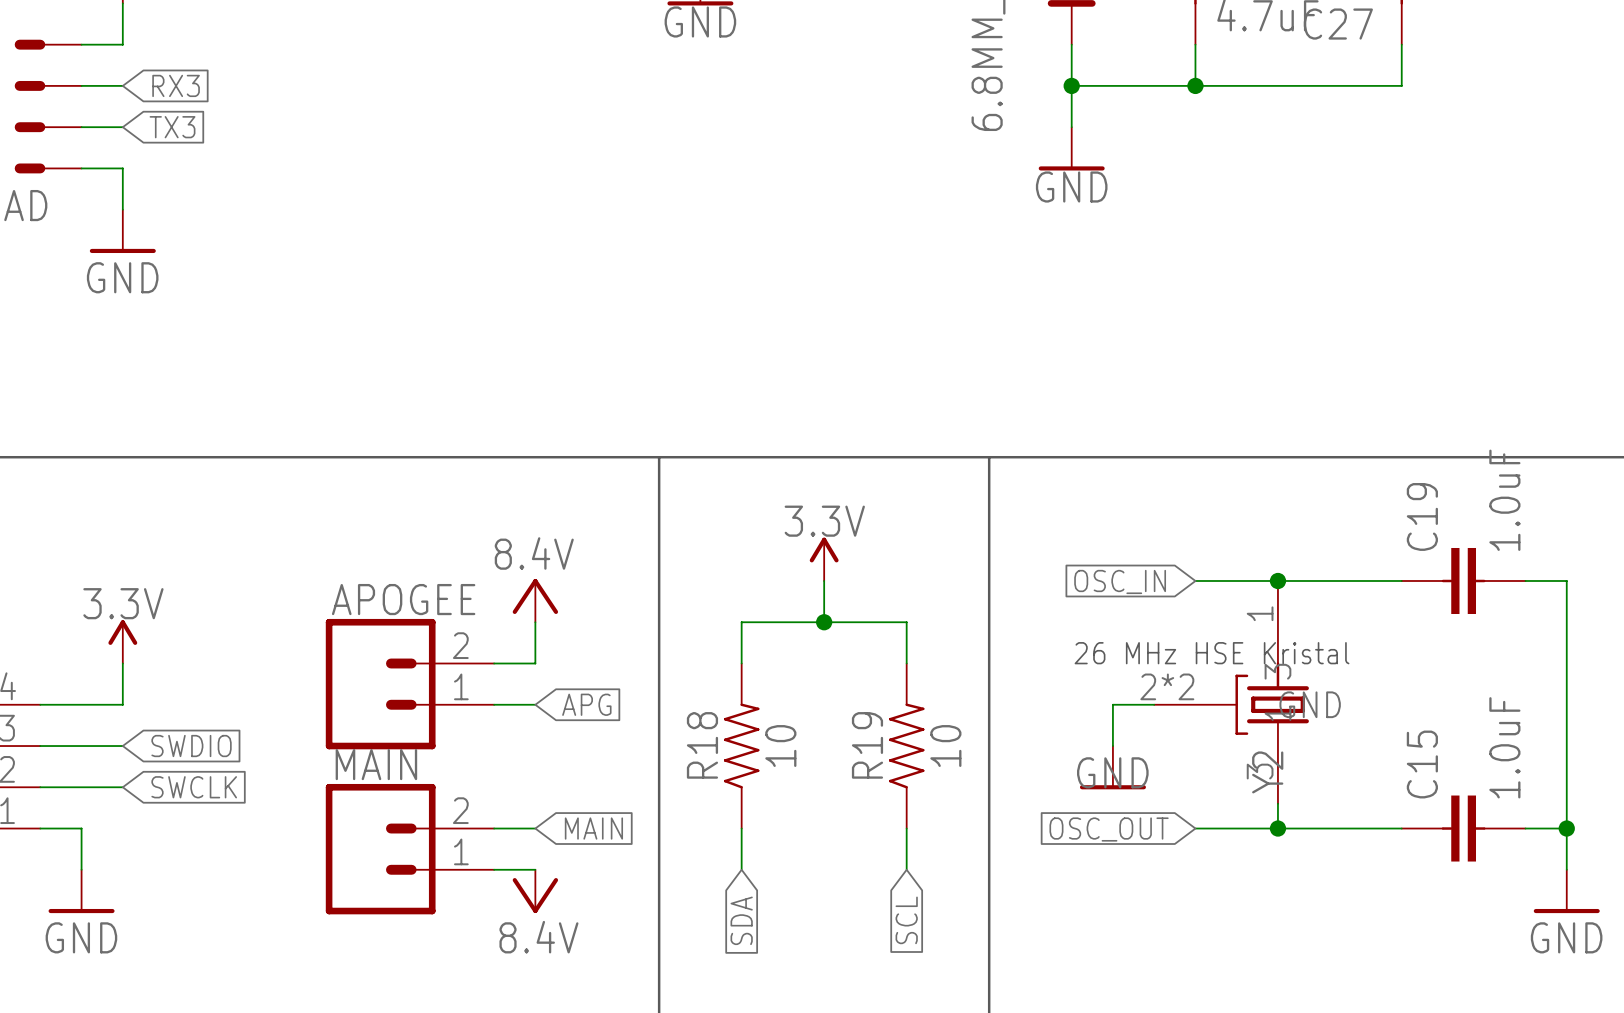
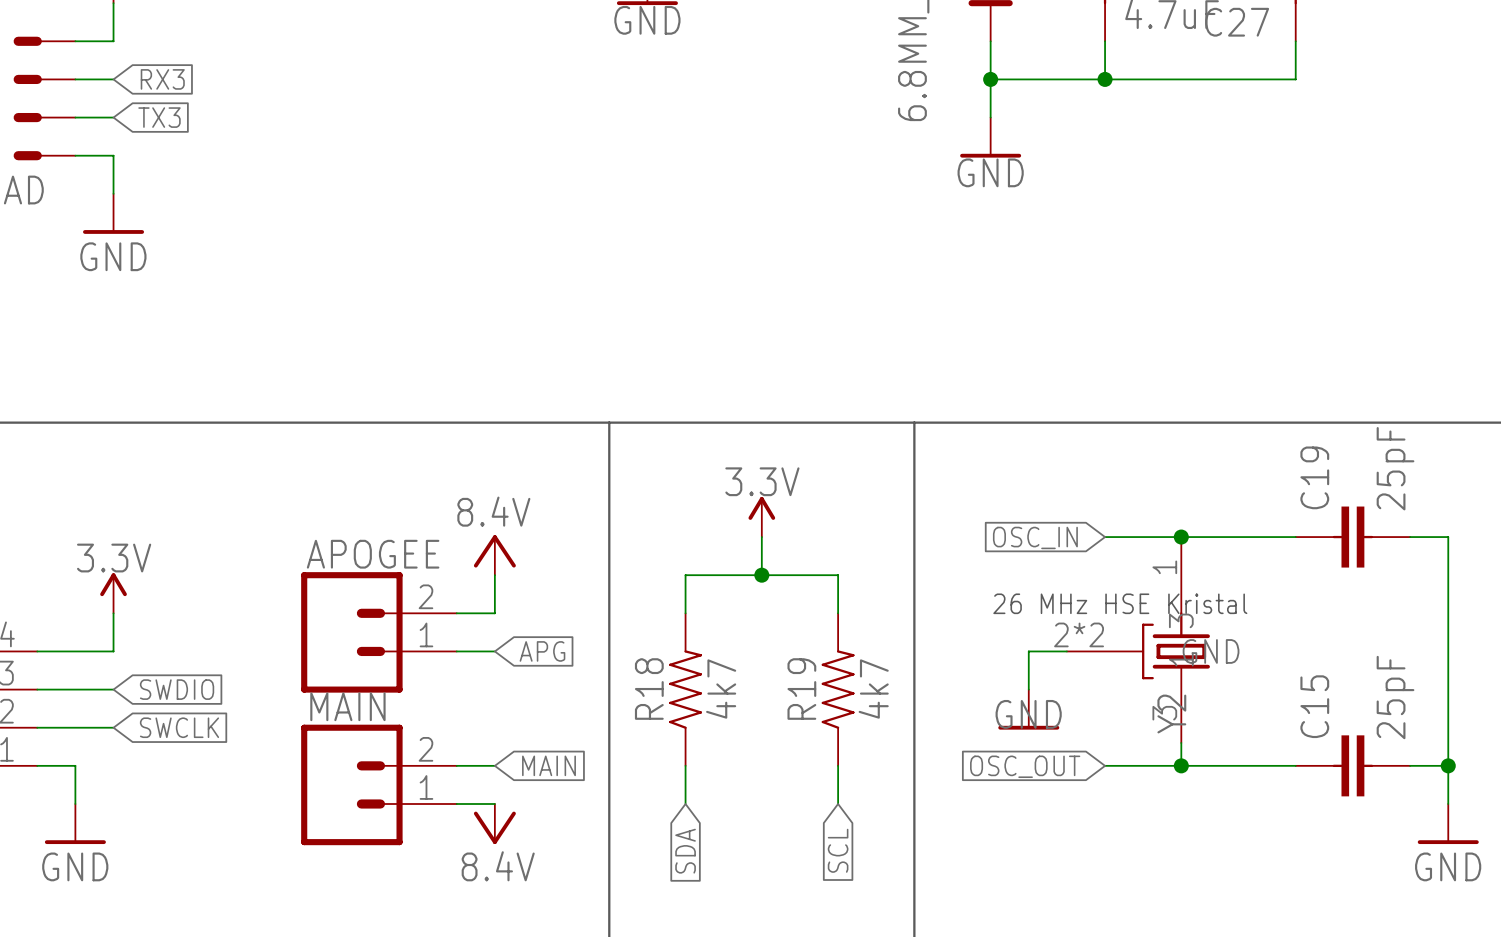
C19 value: 1.0uF (1504, 500) -> 25pF (1395, 468)
R18 value: 10 (780, 746) -> 4k7 (721, 689)
R19 value: 10 (945, 746) -> 4k7 (873, 689)
C15 value: 1.0uF (1504, 747) -> 25pF (1395, 697)

